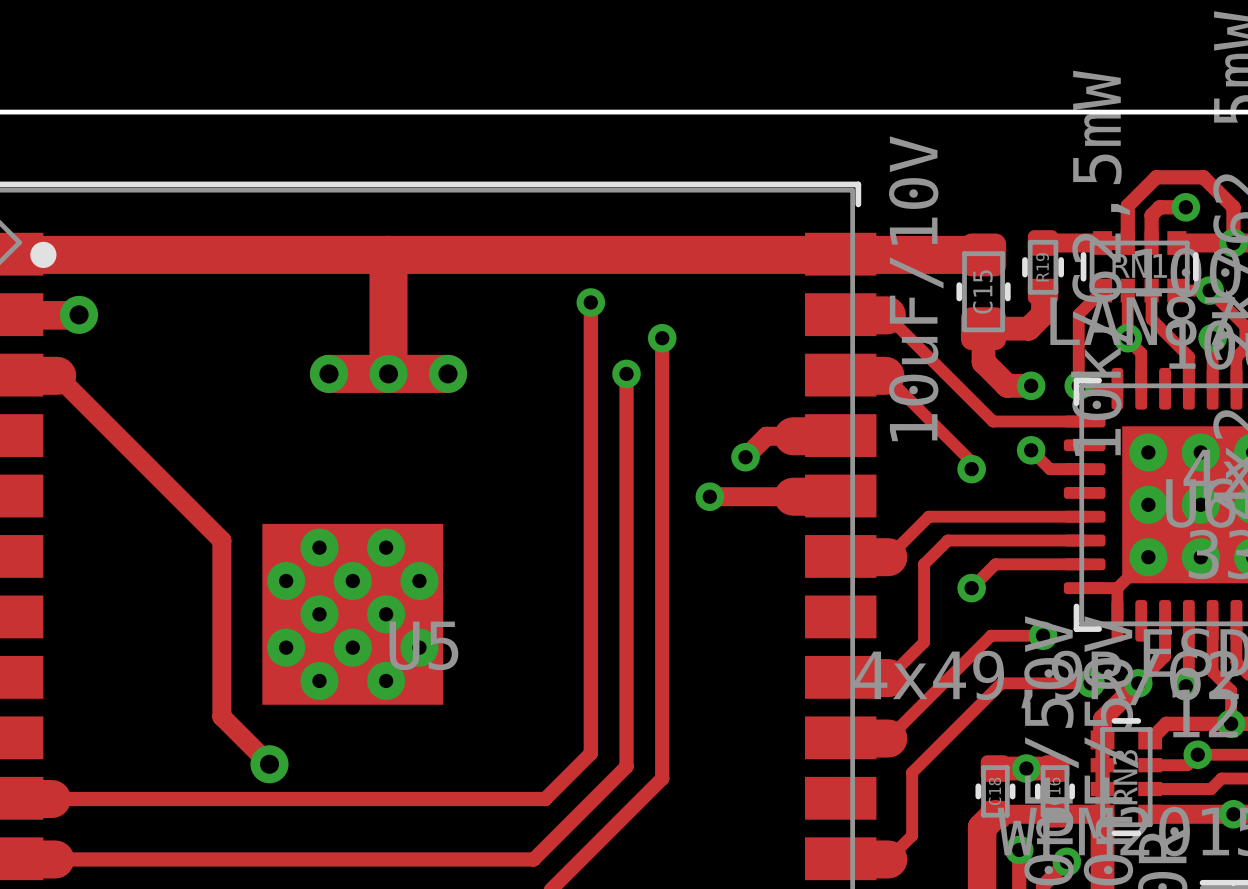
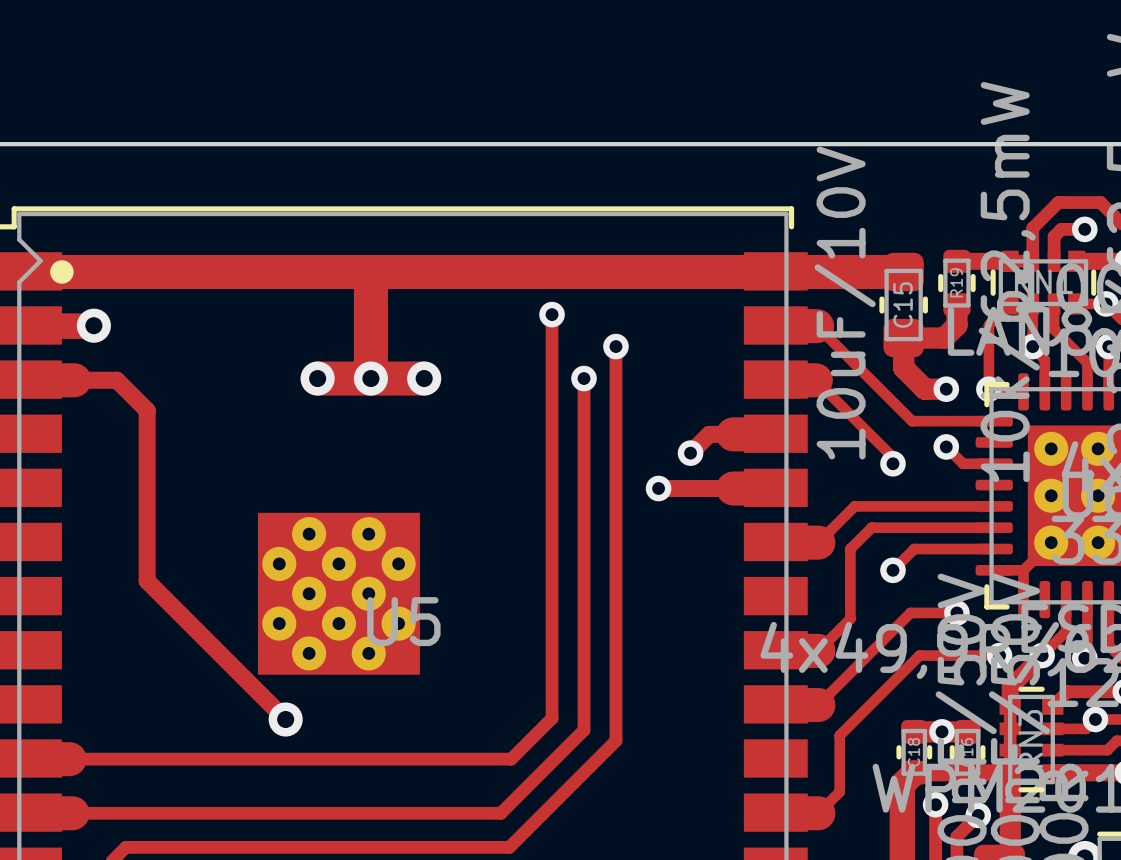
track: (57, 375) (221, 540) (221, 716) (269, 764) -> (74, 380) (116, 380) (147, 410) (147, 580) (285, 719)
via position: (269, 764) -> (285, 719)

